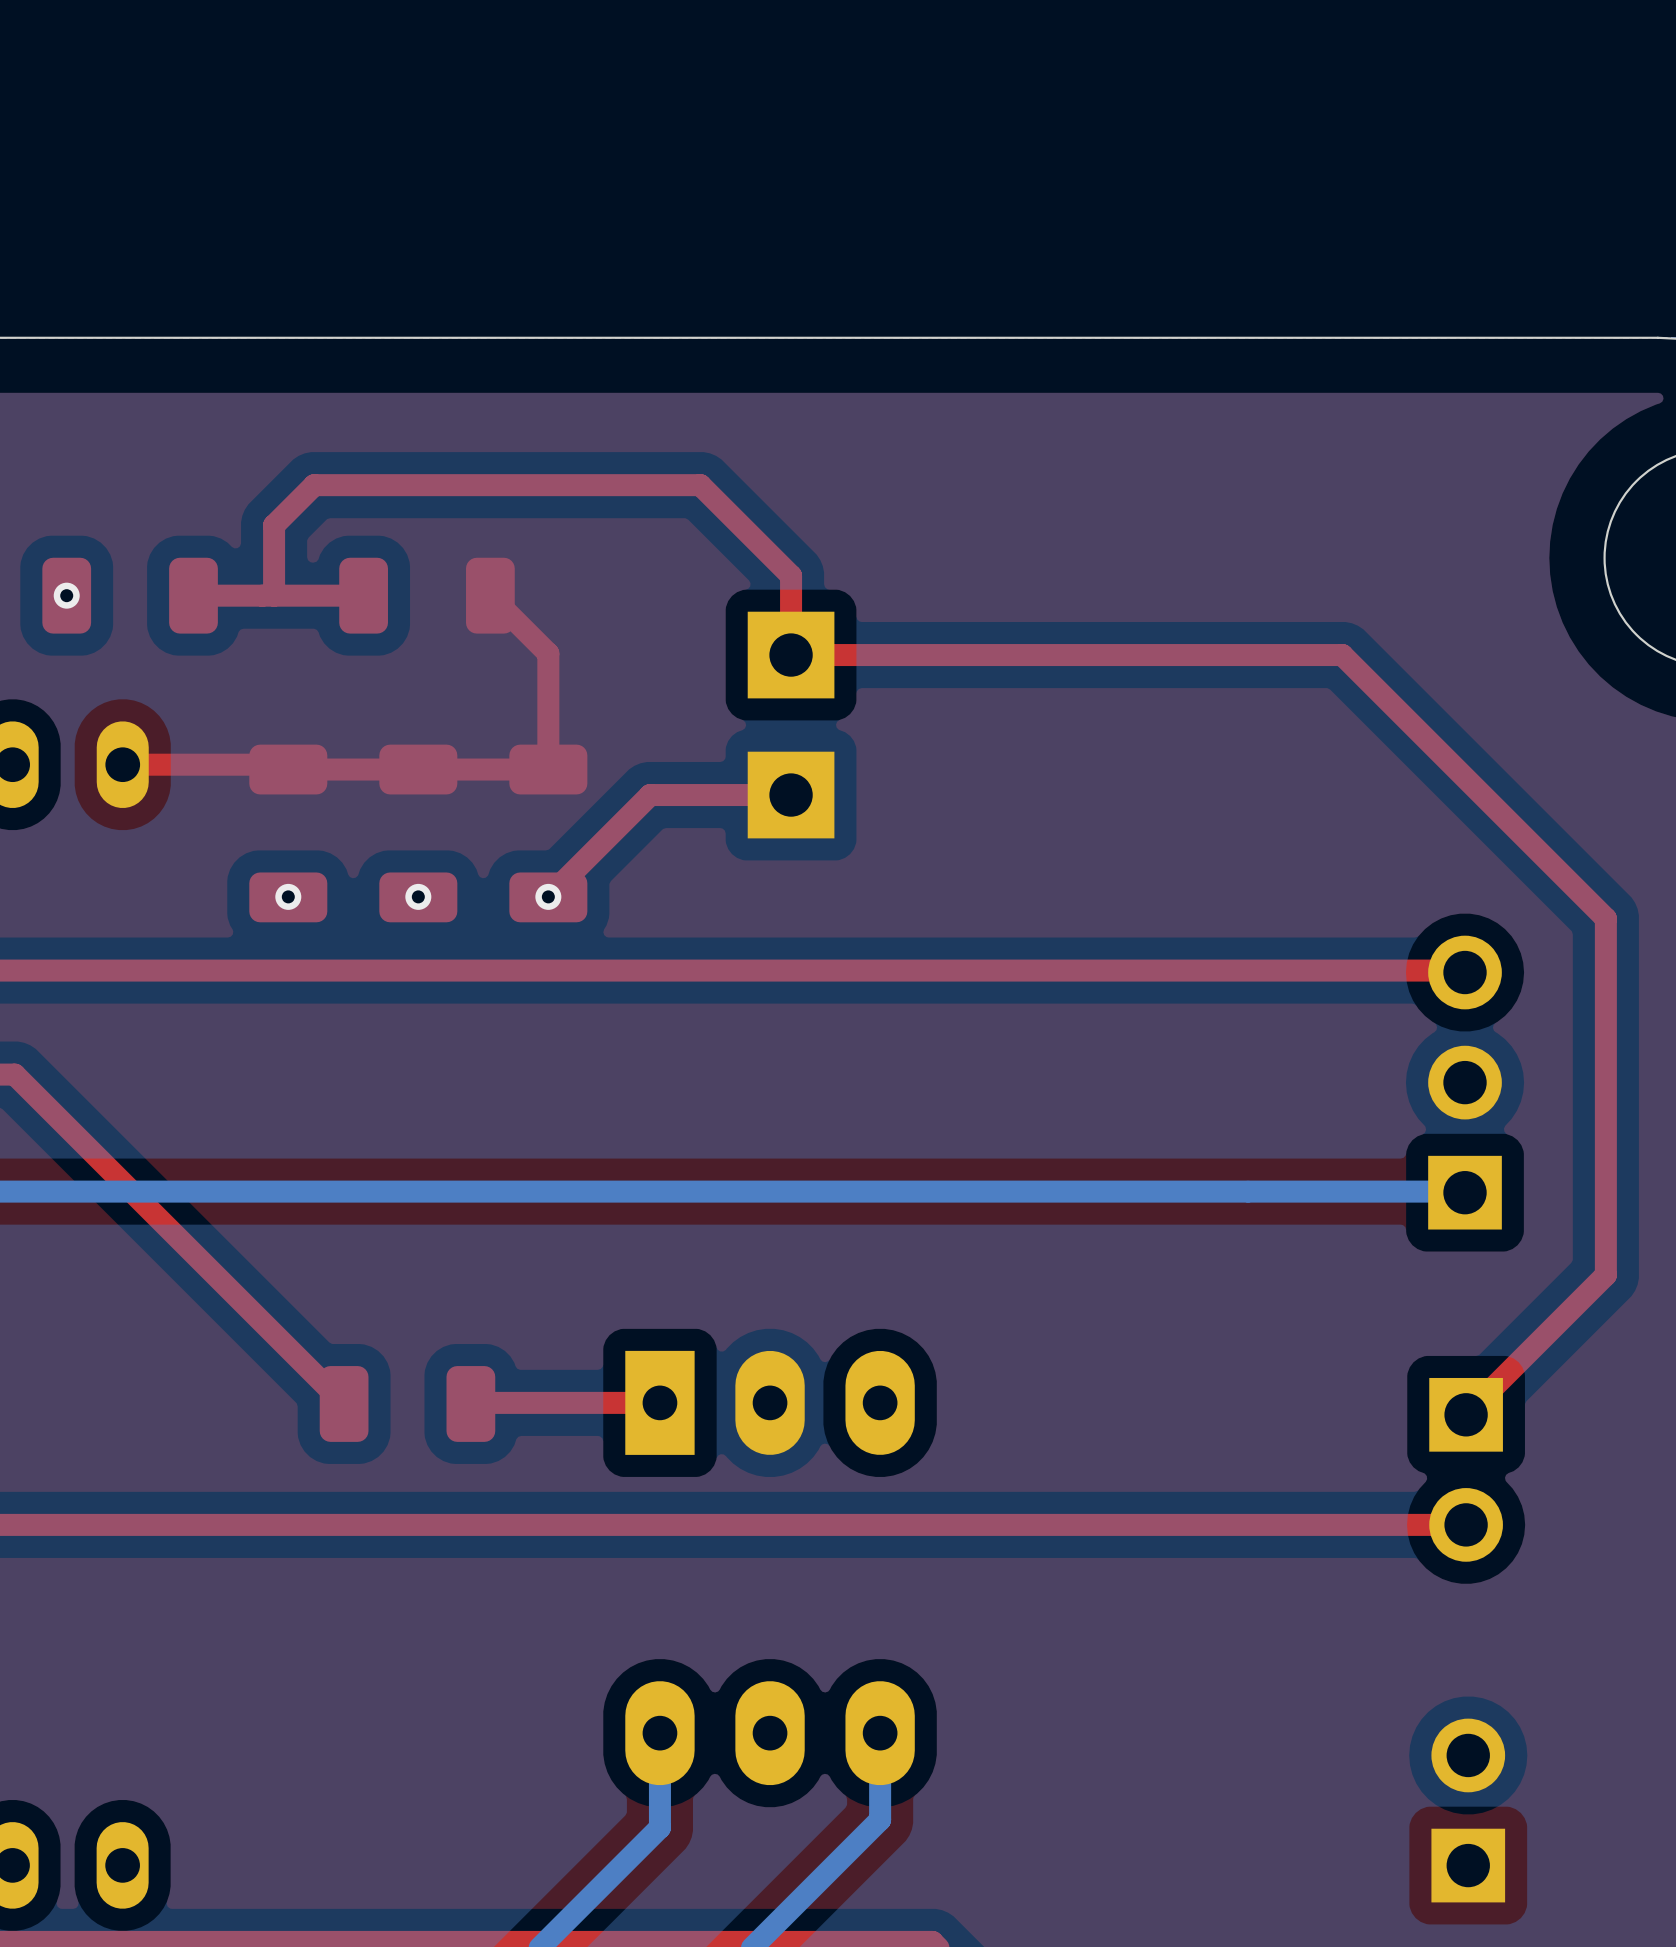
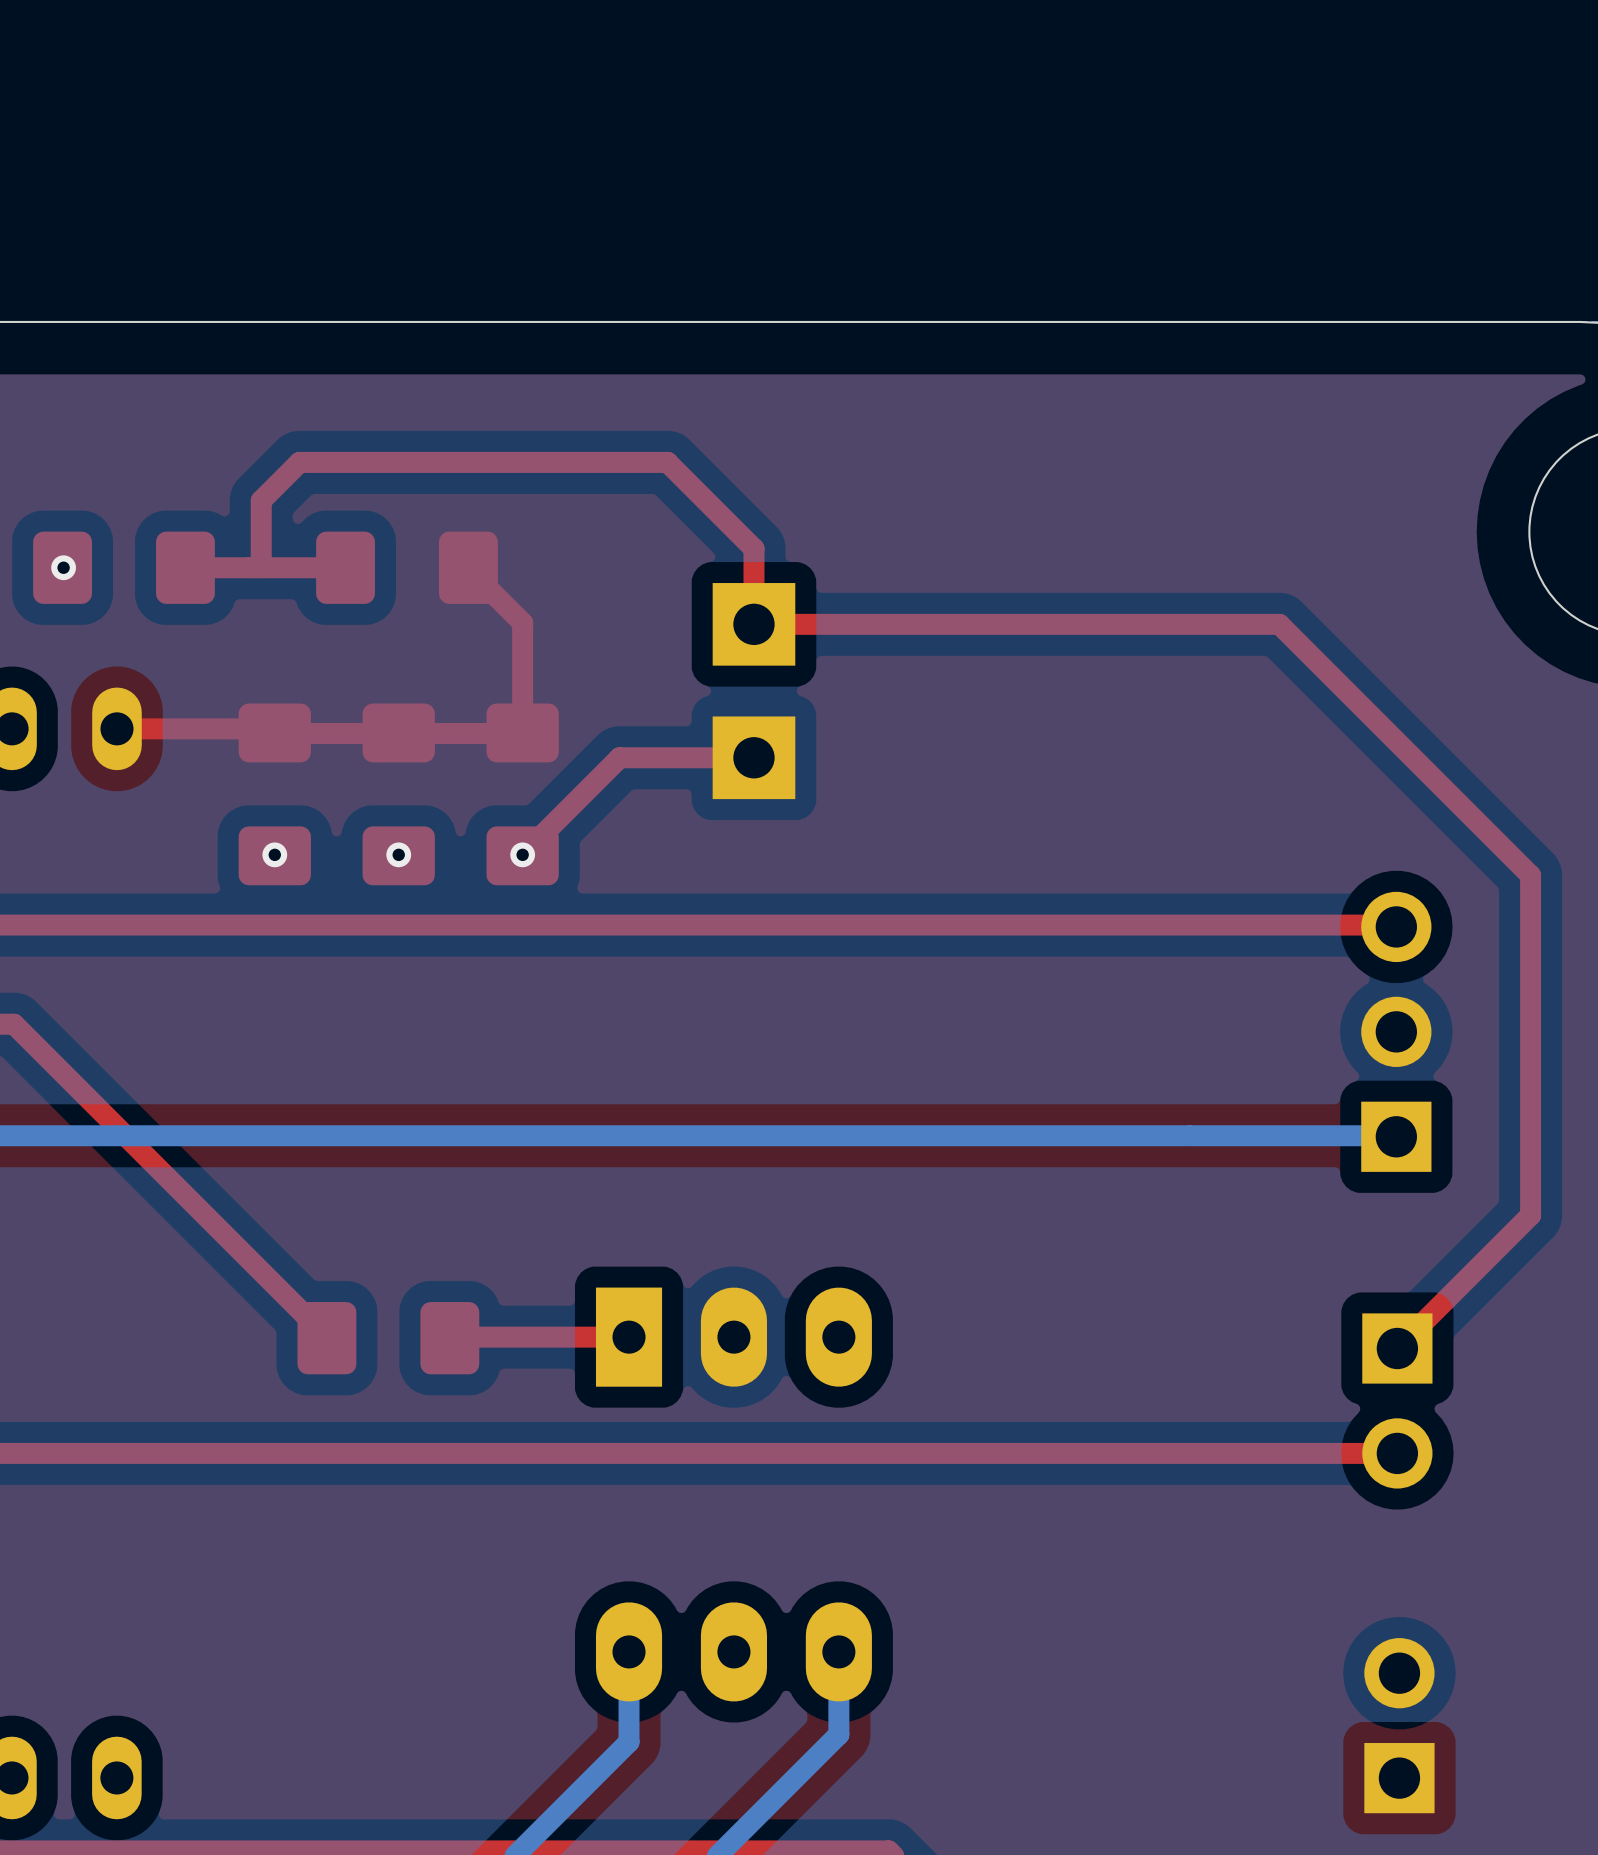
part footprint: [42, 557, 218, 634] -> [33, 531, 215, 604]
part footprint: [339, 557, 515, 634] -> [316, 531, 498, 604]
part footprint: [249, 744, 328, 923] -> [238, 703, 311, 886]
part footprint: [379, 744, 458, 923] -> [362, 703, 435, 886]
part footprint: [509, 744, 588, 923] -> [486, 703, 559, 886]
part footprint: [319, 1366, 496, 1442] -> [297, 1302, 480, 1375]

